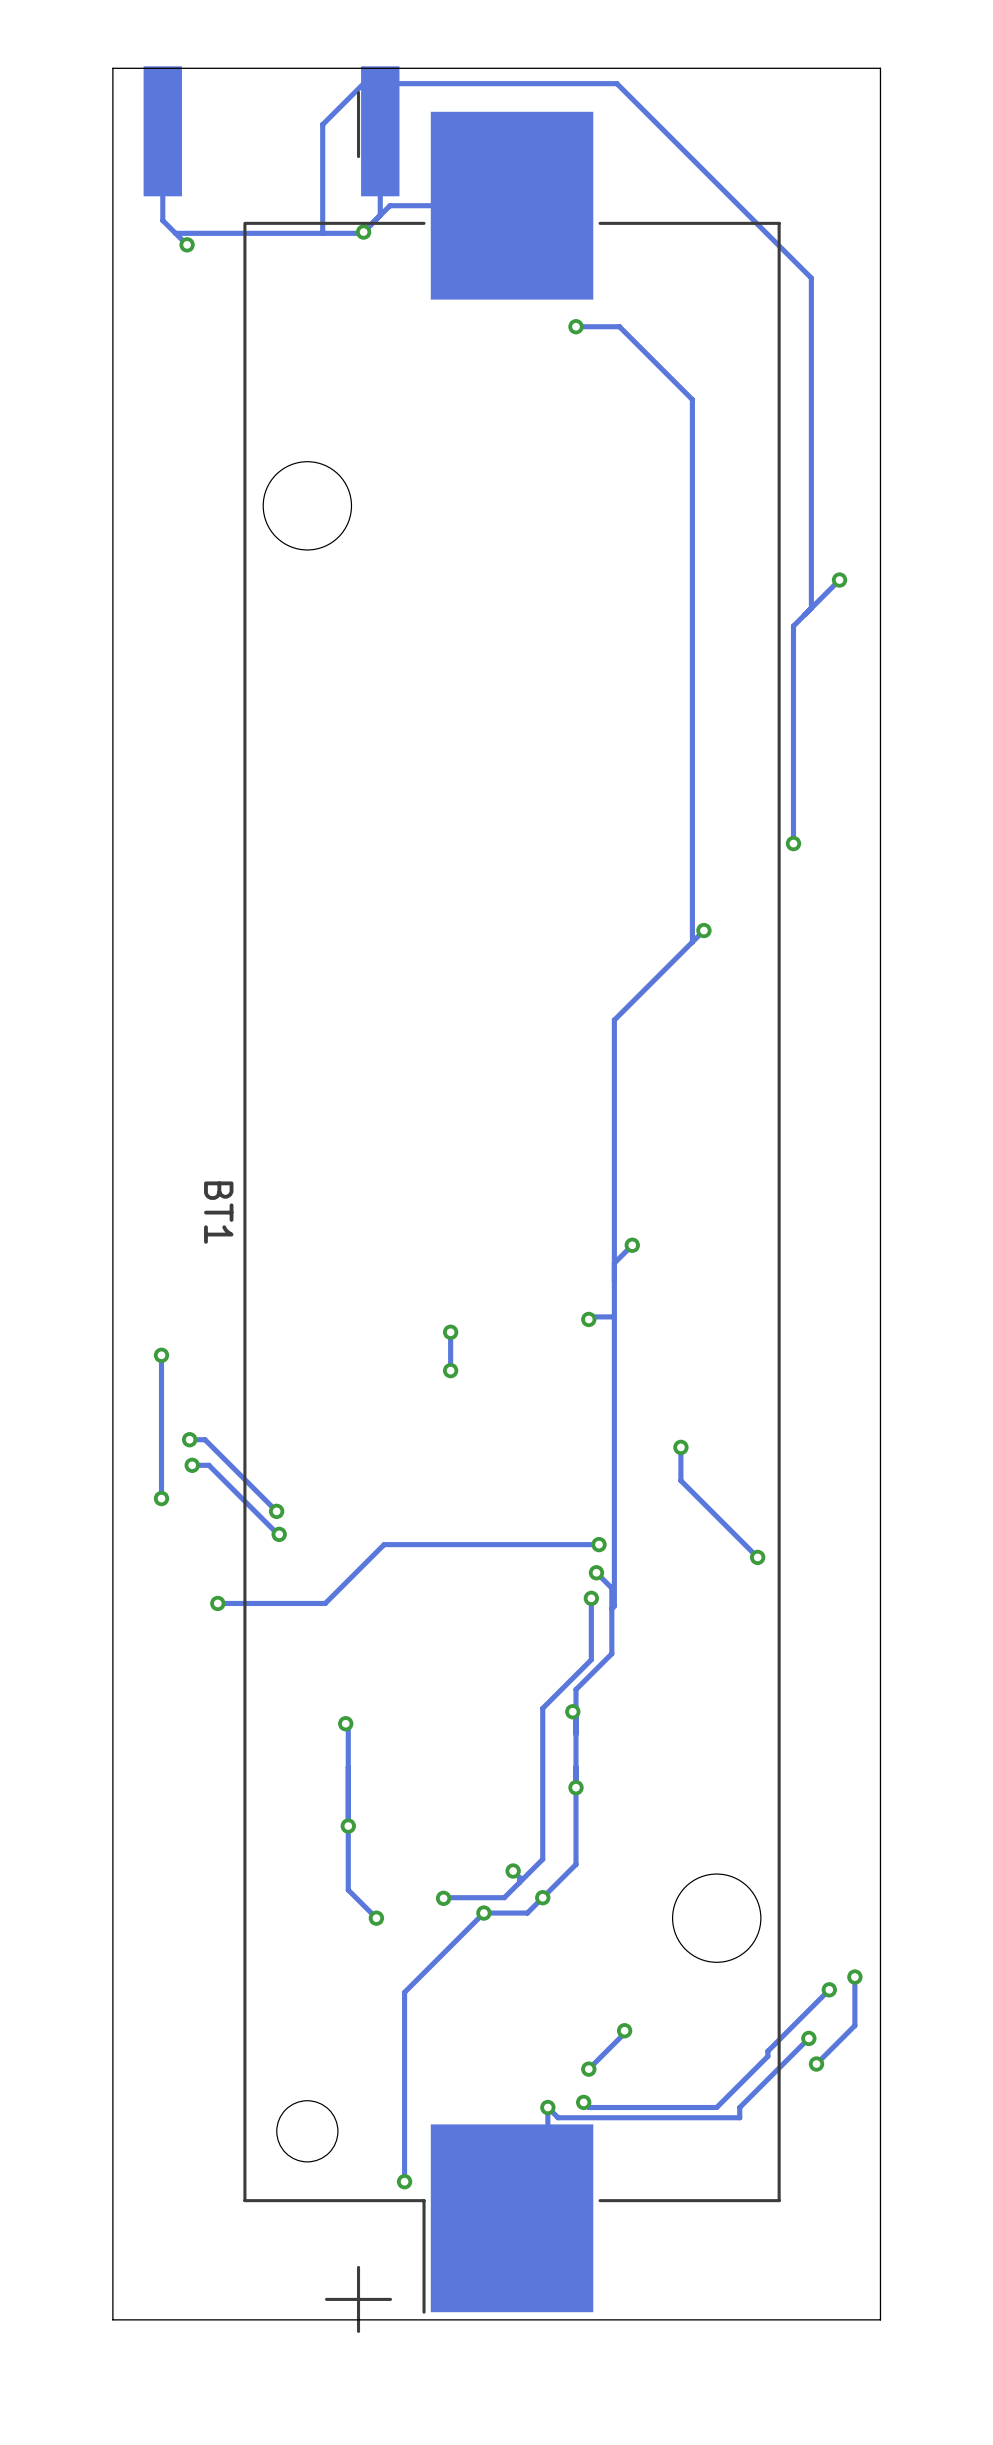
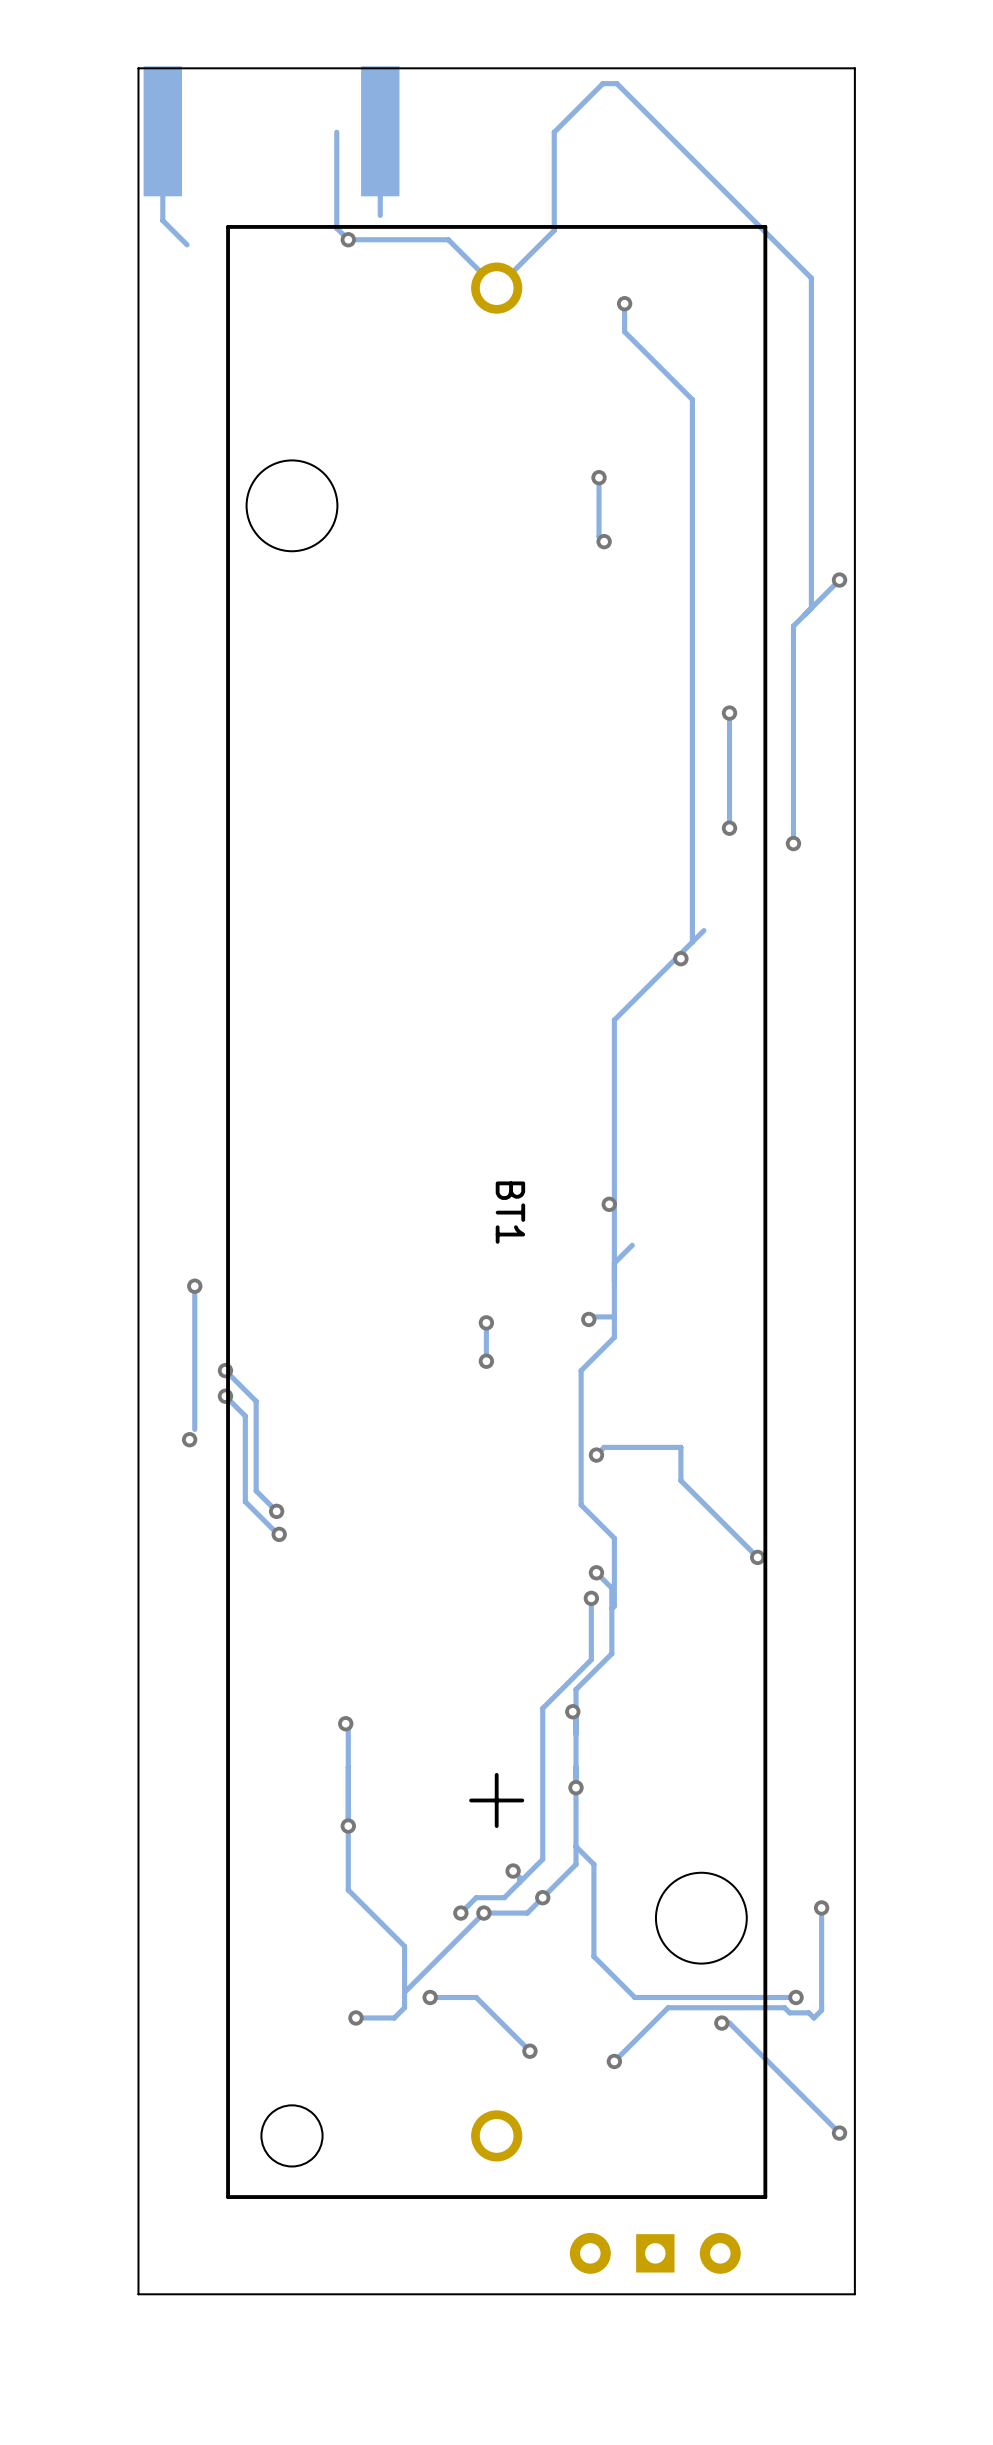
board edge: (854, 68) (880, 68) (880, 2319) (112, 2319) (112, 68) (138, 68) -> (854, 68) (854, 2294) (138, 2294) (138, 68)
track: (602, 83) (363, 83) (322, 124) (322, 233) -> (602, 83) (554, 132) (554, 230) (496, 288) (448, 239) (348, 239) (336, 228) (336, 132)
BT1 footprint: [243, 91, 781, 2333] -> [226, 225, 768, 2199]
track: (512, 205) (389, 205) (362, 233) (175, 233) -> none
via position: (363, 232) -> (348, 239)
via: (187, 244) -> none
track: (576, 326) (619, 326) (624, 331) -> (624, 303) (624, 331)
via position: (576, 326) -> (624, 303)
track: none -> (599, 477) (599, 536) (604, 541)
via: none -> (599, 477)
via: none -> (604, 541)
track: none -> (729, 713) (729, 828)
via: none -> (729, 713)
via: none -> (729, 828)
via position: (703, 930) -> (680, 958)
BT1 name position: BT1 (218, 1212) -> BT1 (510, 1212)
via position: (632, 1245) -> (609, 1204)
via: none -> (194, 1286)
via: none -> (486, 1322)
track: (450, 1332) (450, 1370) -> (486, 1322) (486, 1361)
via: (450, 1332) -> none
track: (614, 1337) (614, 1538) -> (614, 1337) (581, 1370) (581, 1505) (614, 1538)
track: (161, 1355) (161, 1498) -> (194, 1286) (194, 1429)
via: (161, 1355) -> none
via: none -> (486, 1361)
via: none -> (225, 1370)
via: (450, 1370) -> none
via: none -> (225, 1396)
track: (189, 1439) (205, 1439) (256, 1490) -> (225, 1370) (256, 1401) (256, 1490)
track: none -> (680, 1447) (604, 1447) (596, 1455)
via: (680, 1447) -> none
via: none -> (596, 1455)
track: (192, 1465) (208, 1465) (245, 1501) -> (225, 1396) (245, 1416) (245, 1501)
via: (192, 1465) -> none
via: (161, 1498) -> none
track: (599, 1544) (384, 1544) (325, 1603) (217, 1603) -> none
via: (599, 1544) -> none
via: (217, 1603) -> none
track: none -> (576, 1846) (593, 1864) (593, 1956) (634, 1997) (796, 1997)
track: (476, 1897) (443, 1898) -> (476, 1897) (460, 1913)
via position: (443, 1898) -> (460, 1913)
track: none -> (821, 1907) (821, 2010) (813, 2017) (808, 2012) (789, 2012) (784, 2007) (668, 2007) (614, 2061)
via: none -> (821, 1907)
track: none -> (376, 1918) (404, 1946) (404, 1992)
via: (376, 1918) -> none
track: (854, 1977) (854, 2025) (816, 2064) -> none
via: (854, 1977) -> none
track: (829, 1989) (767, 2051) (767, 2056) (716, 2107) (588, 2107) (583, 2102) -> none
via: (829, 1989) -> none
track: none -> (430, 1997) (476, 1997) (529, 2051)
via: none -> (430, 1997)
via: none -> (796, 1997)
track: (404, 2007) (404, 2181) -> (404, 2007) (394, 2017) (355, 2017)
via: none -> (355, 2017)
track: none -> (721, 2023) (729, 2023) (839, 2133)
via: none -> (721, 2023)
track: (624, 2030) (624, 2033) (588, 2069) -> none
via: (624, 2030) -> none
track: (808, 2038) (739, 2107) (739, 2117) (558, 2117) (547, 2107) (547, 2182) (466, 2263) -> none
via: (808, 2038) -> none
via: none -> (529, 2051)
via: none -> (614, 2061)
via: (816, 2064) -> none
via: (588, 2069) -> none
via: (583, 2102) -> none
via: (547, 2107) -> none
via: none -> (839, 2133)
via: (404, 2181) -> none
part: none -> (655, 2253)

